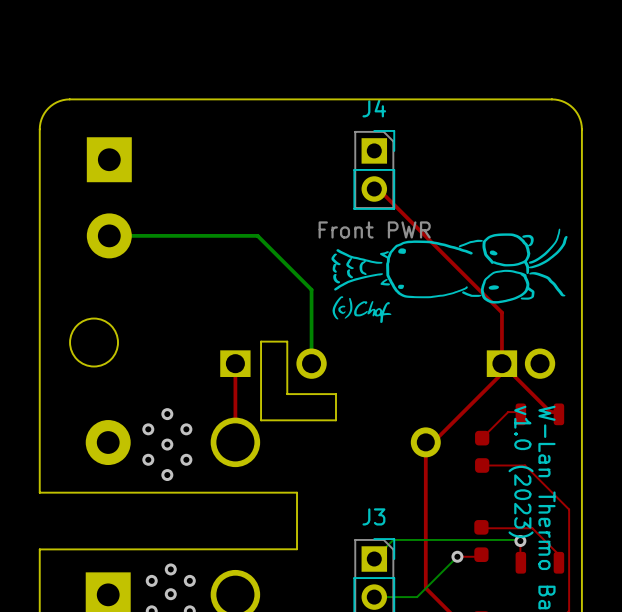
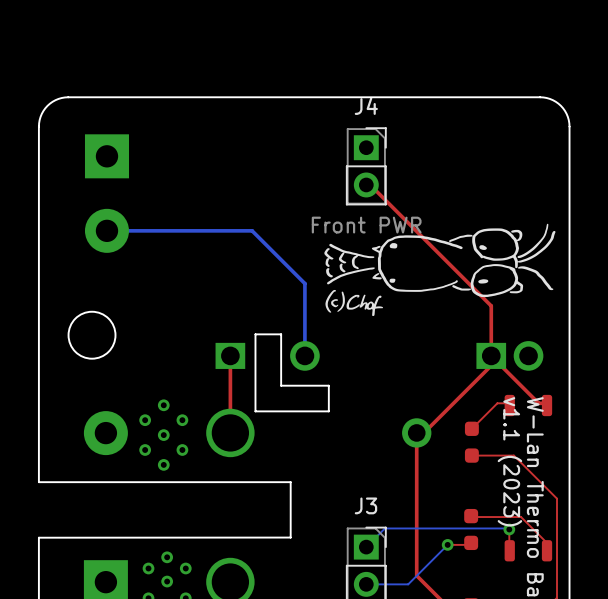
text: v1.0 (2023) (521, 471) -> v1.1 (2023) (509, 461)

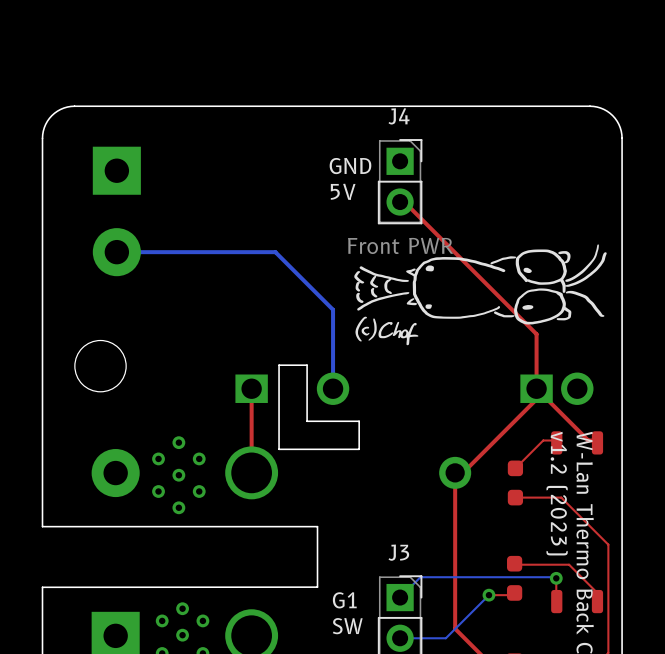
text: none -> GND (350, 166)
text: none -> 5V (343, 191)
text: v1.1 (2023) (509, 461) -> v1.2 (2023) (557, 493)
text: none -> G1 (344, 600)
text: none -> SW (347, 626)

